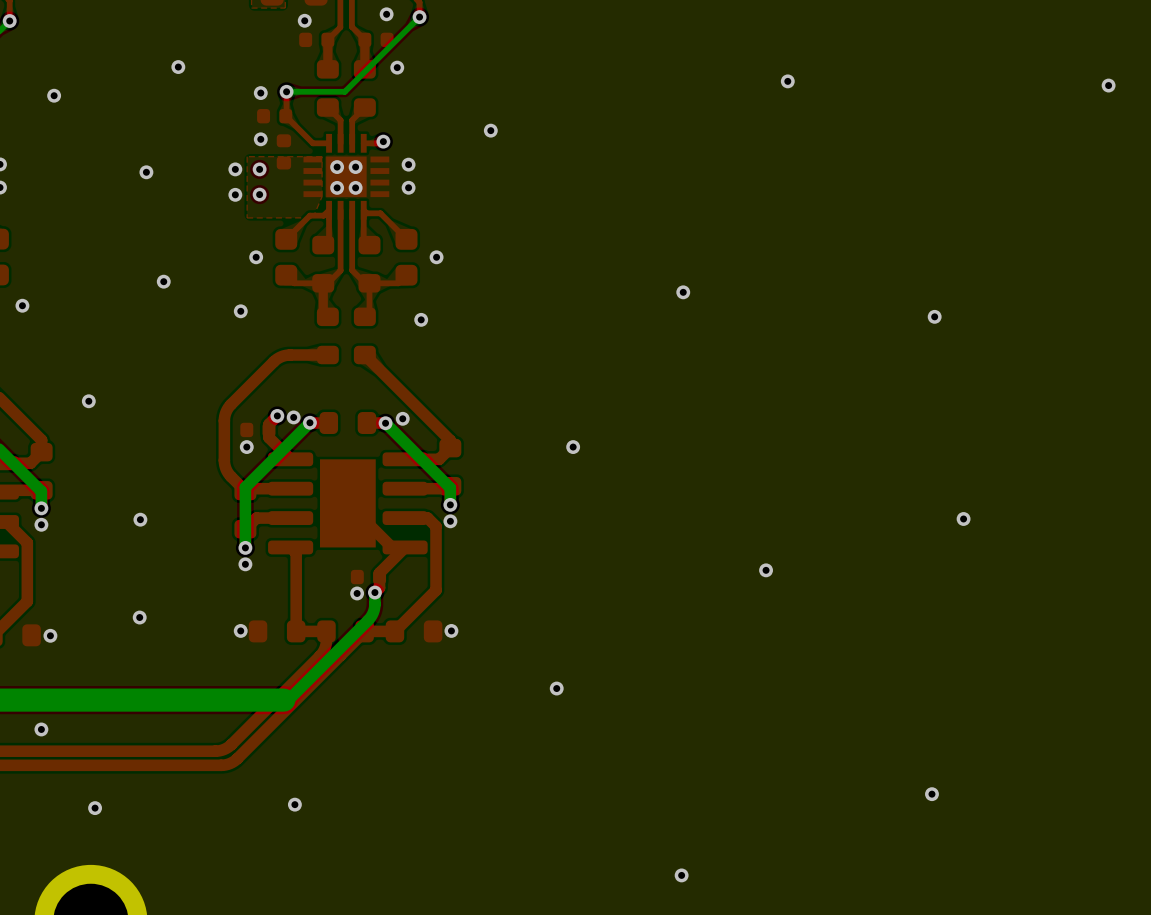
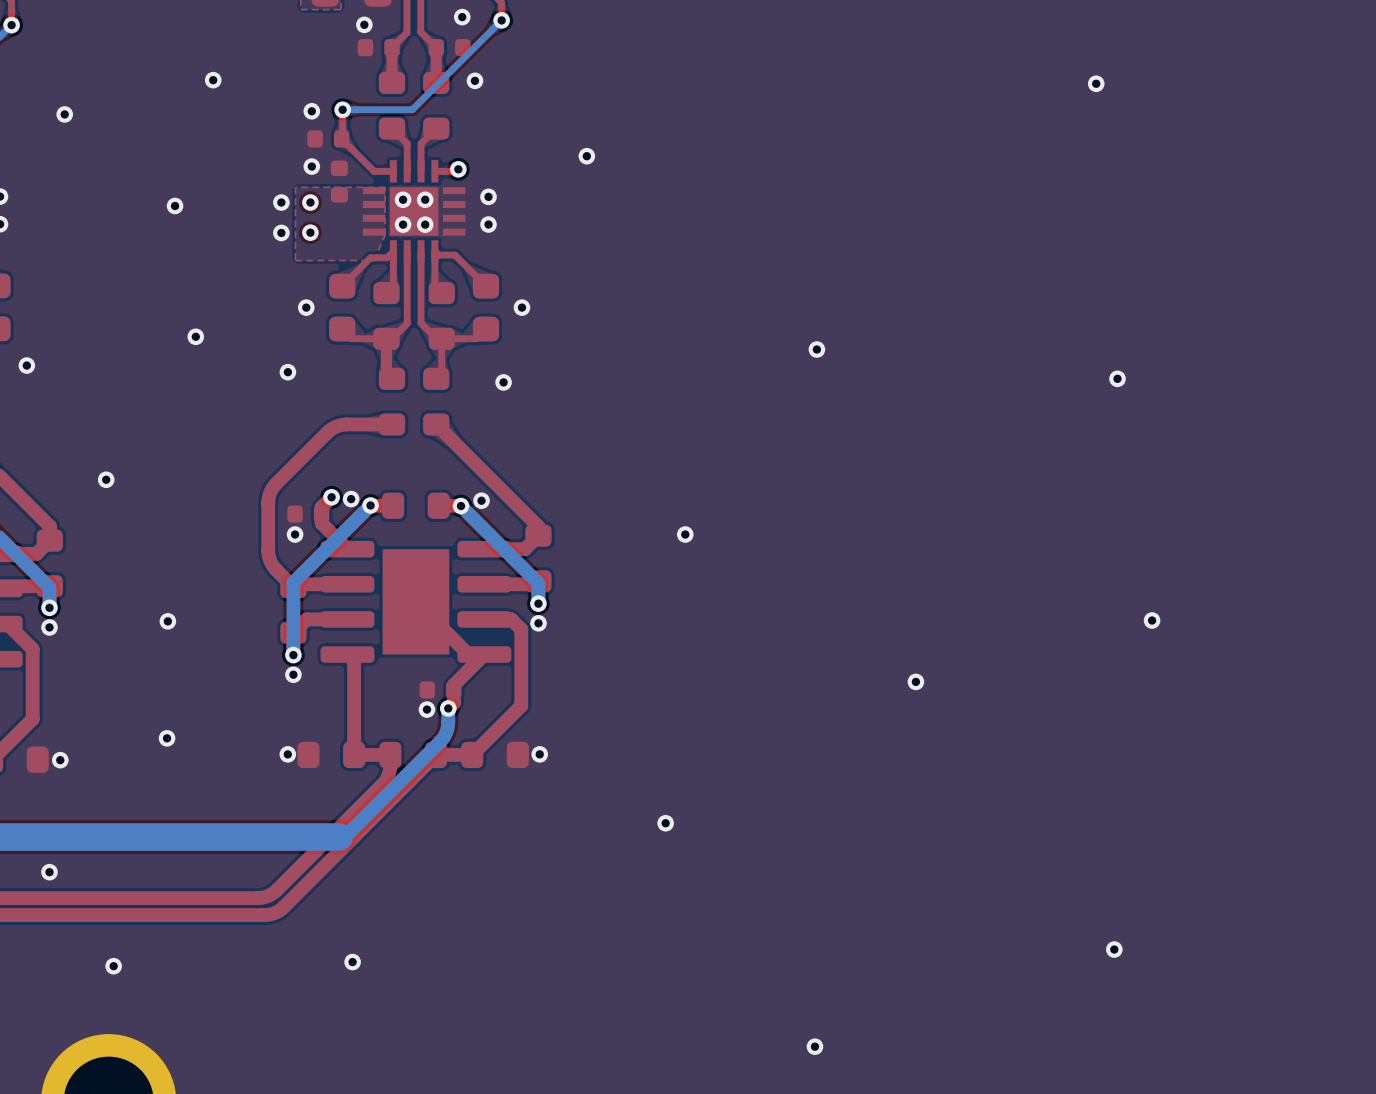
via: none -> (1096, 83)
via: (787, 81) -> none
via: (1108, 85) -> none

